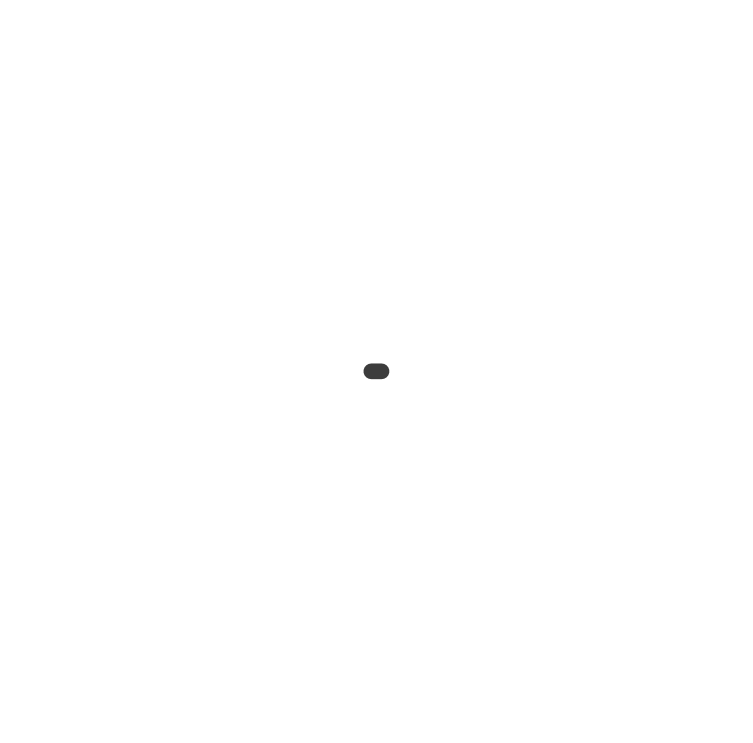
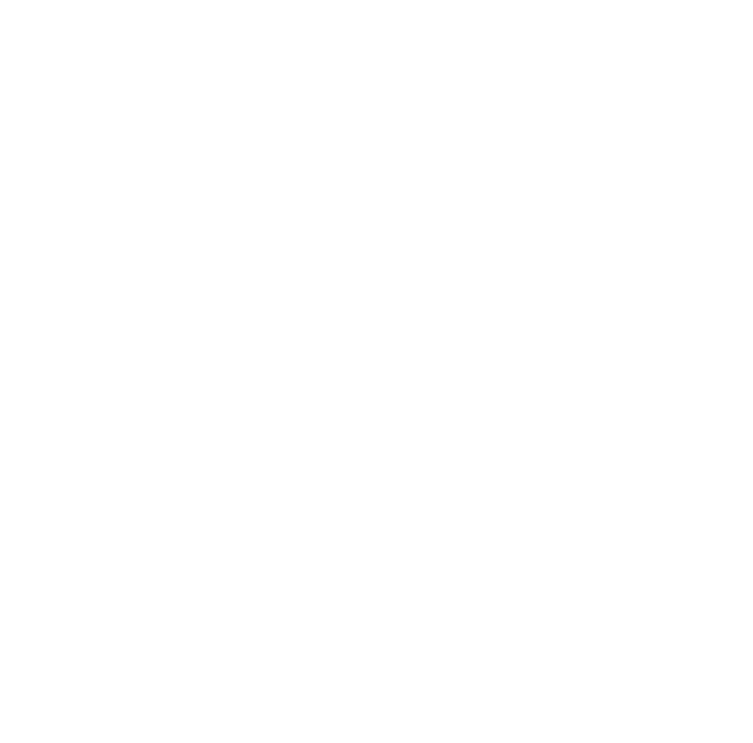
line: (371, 371) (381, 371) -> none

